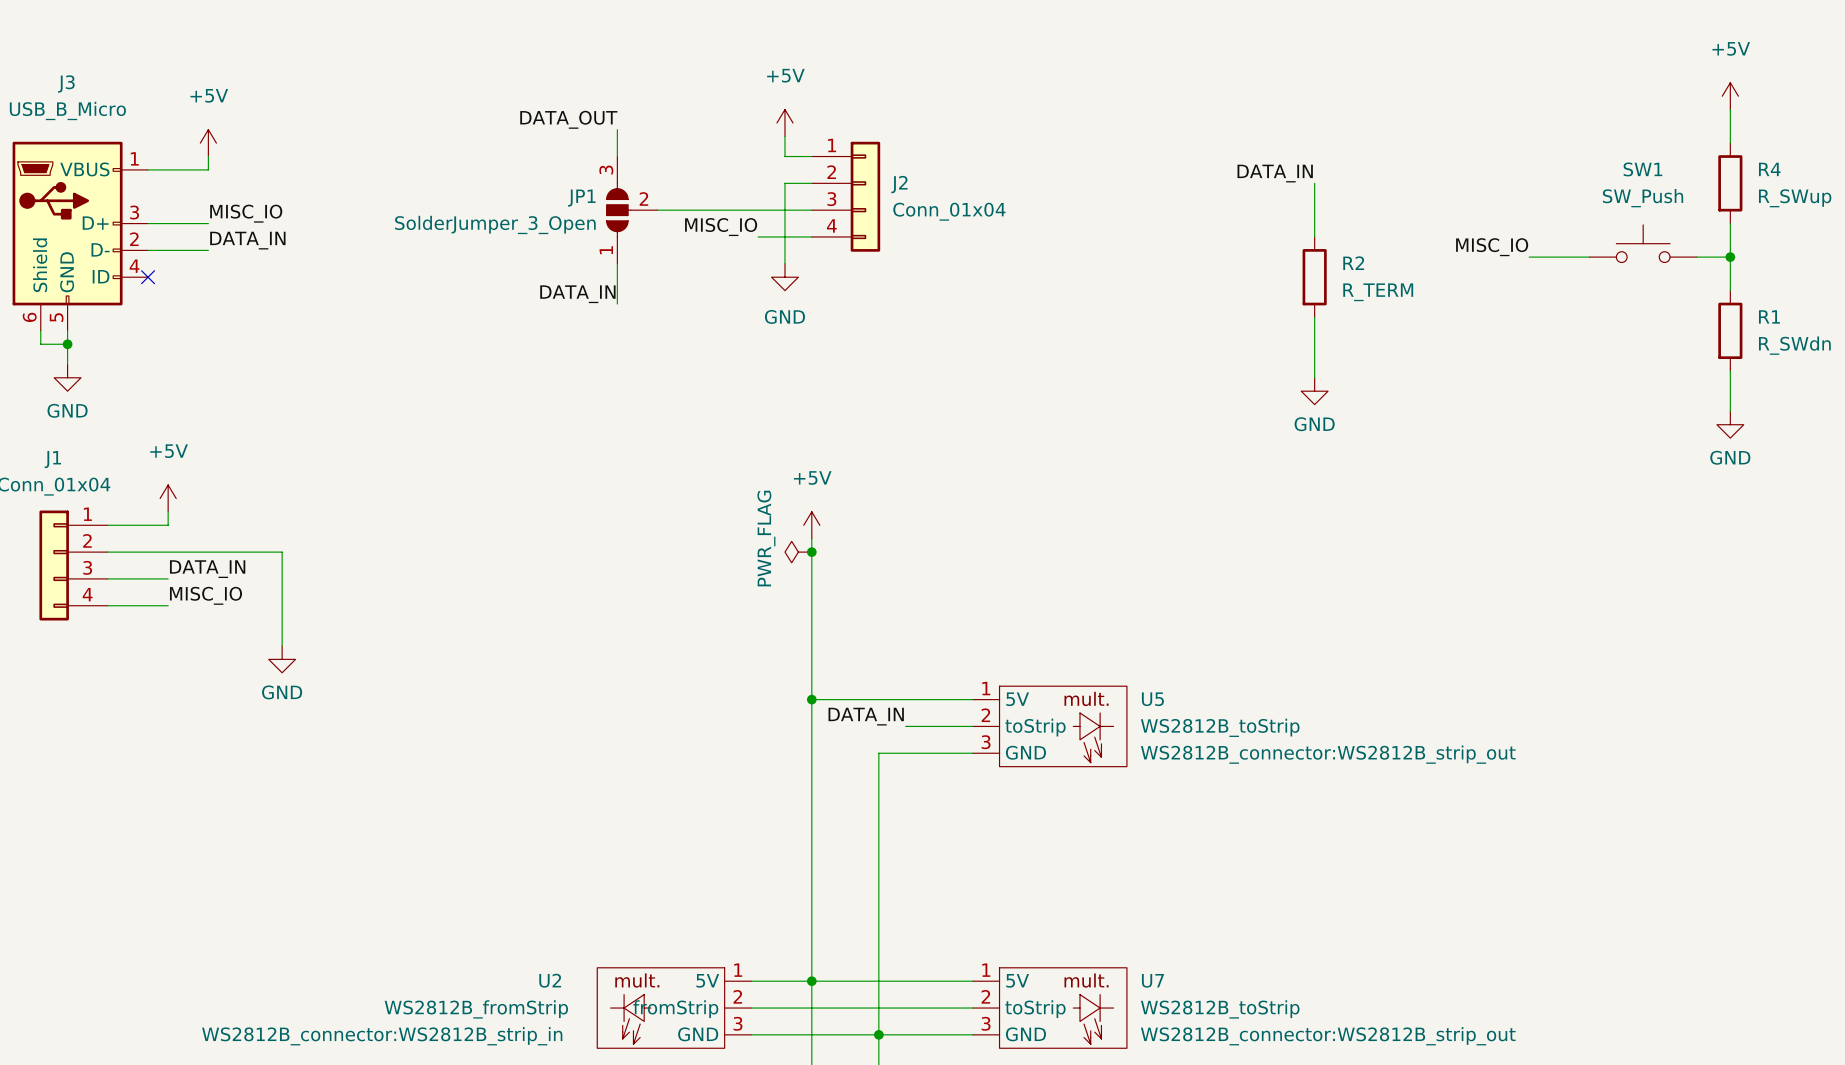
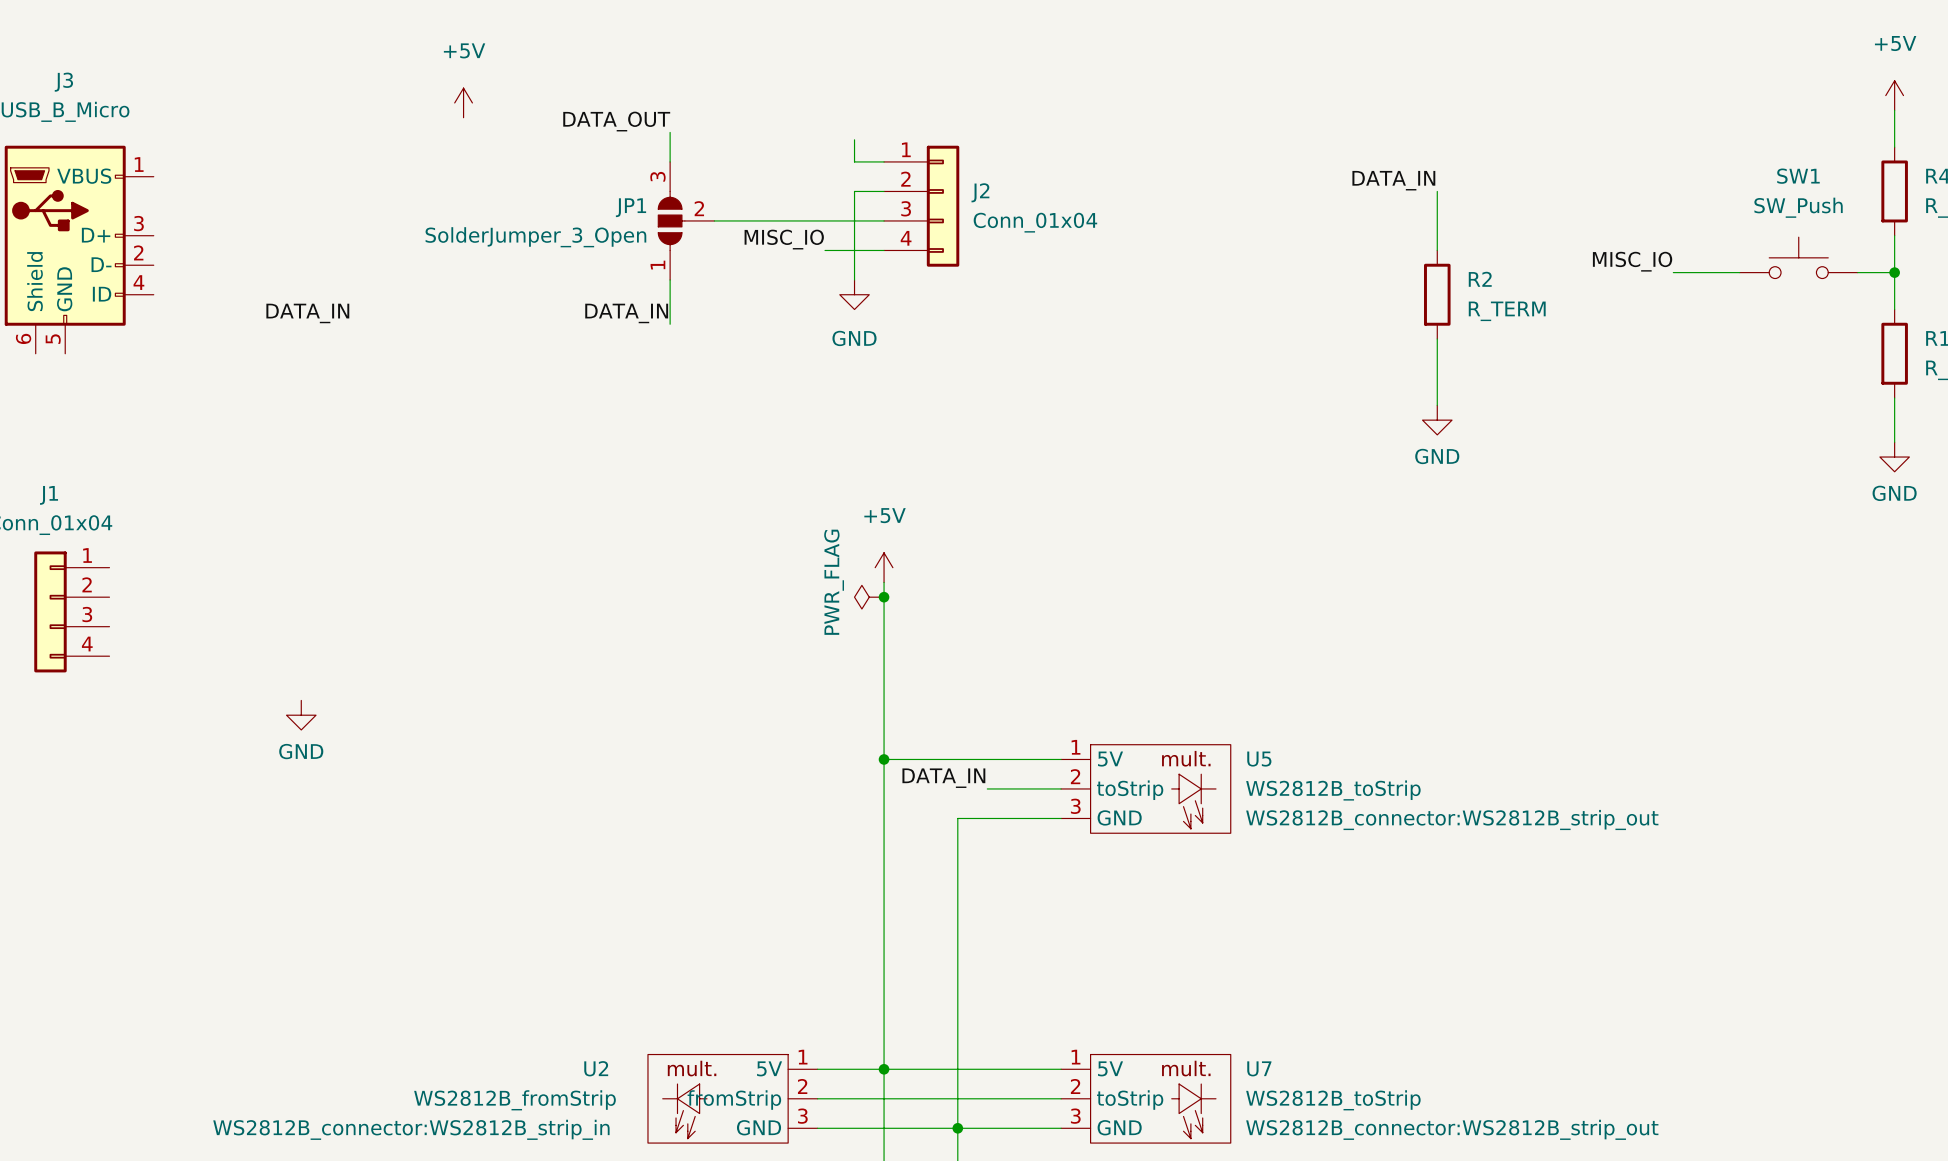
power symbol: none -> +5V (463, 102)
power symbol: +5V (784, 123) -> none
power symbol: +5V (208, 143) -> none
wire: (208, 156) (208, 169) (148, 169) -> none
label: MISC_IO (246, 213) -> none
wire: (148, 223) (208, 223) -> none
label position: DATA_IN (247, 240) -> DATA_IN (307, 313)
wire: (148, 250) (208, 250) -> none
no-connect mark: (148, 277) -> none
wire: (40, 330) (40, 344) (67, 344) -> none
wire: (67, 330) (67, 364) -> none
junction: (67, 344) -> none
power symbol: GND (67, 377) -> none
power symbol: +5V (168, 498) -> none
wire: (168, 511) (168, 525) (107, 525) -> none
wire: (107, 552) (282, 552) (282, 645) -> none
label: DATA_IN (207, 569) -> none
wire: (107, 578) (168, 578) -> none
label: MISC_IO (205, 595) -> none
wire: (107, 605) (168, 605) -> none

